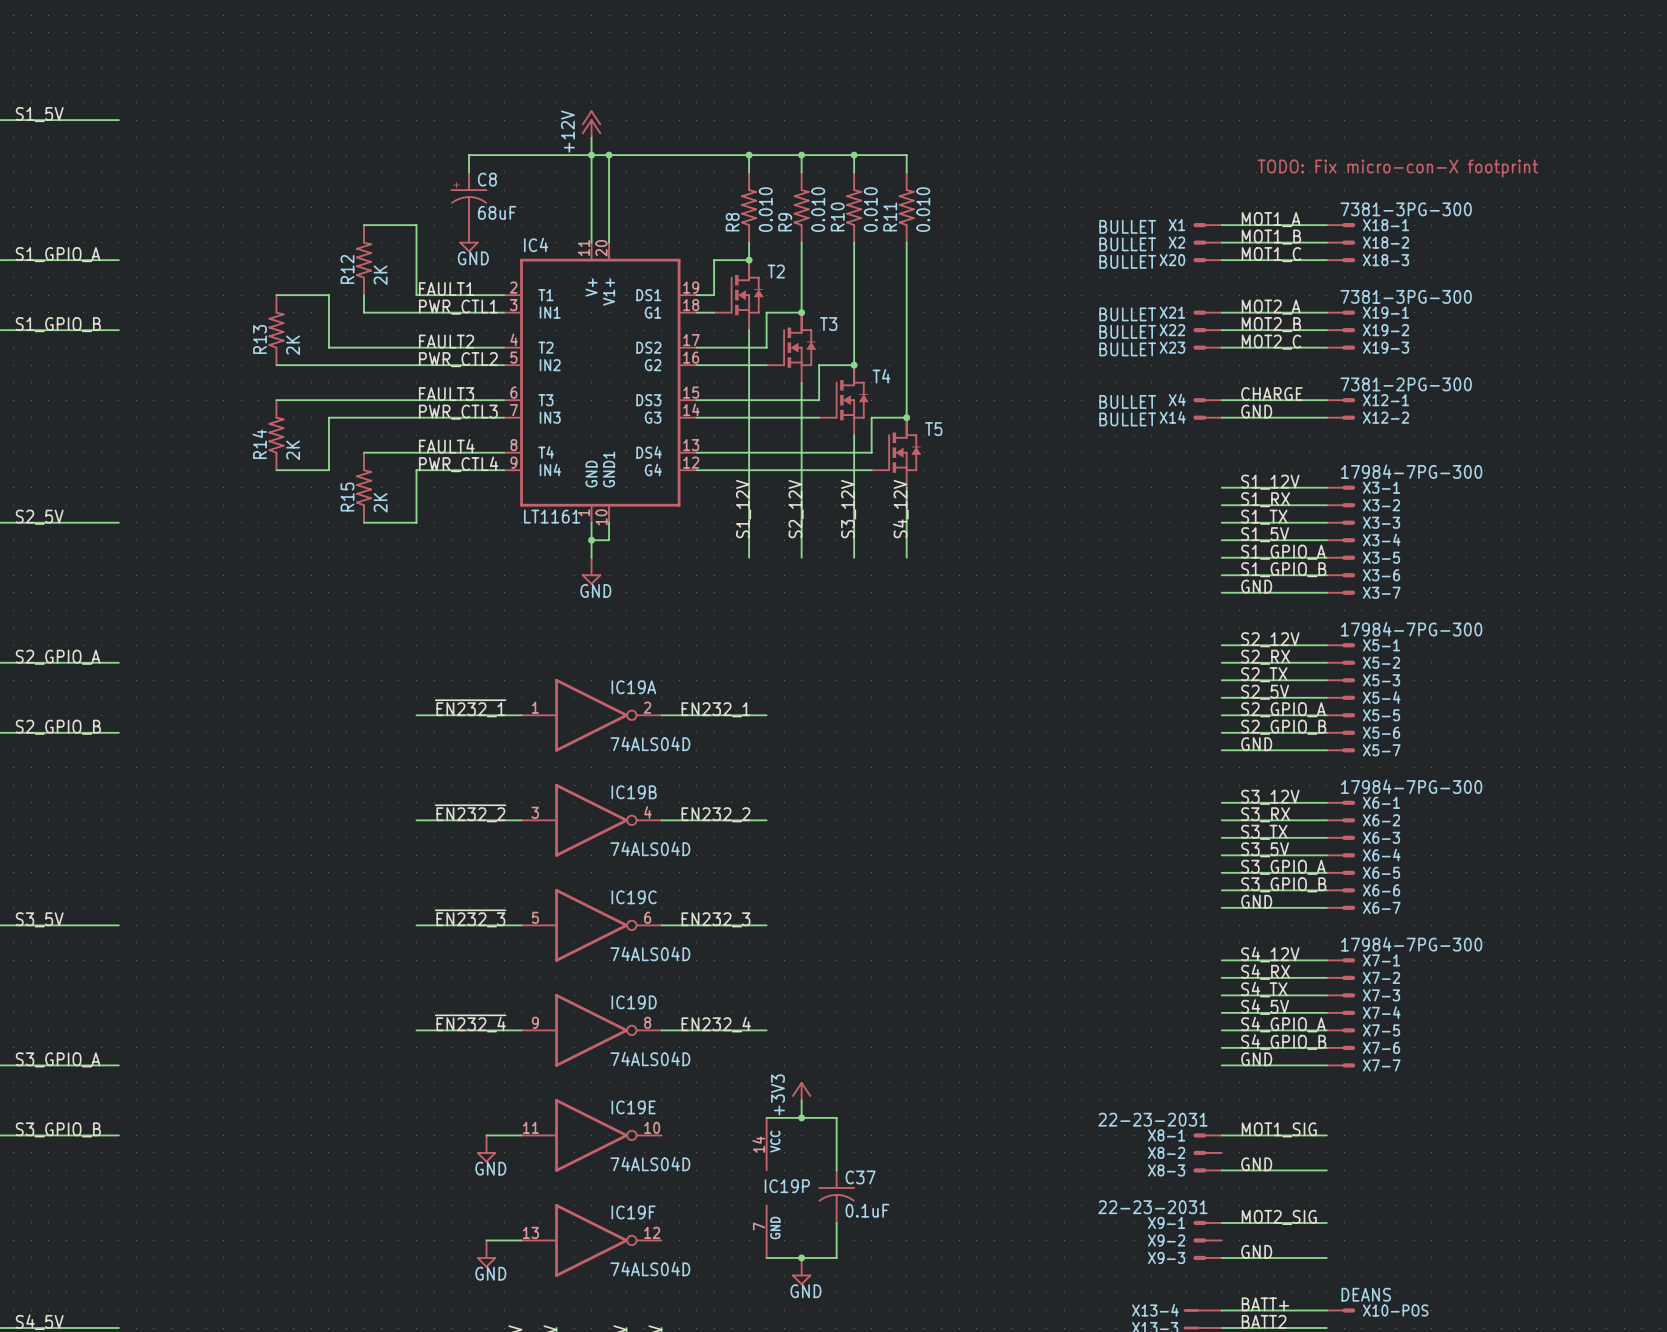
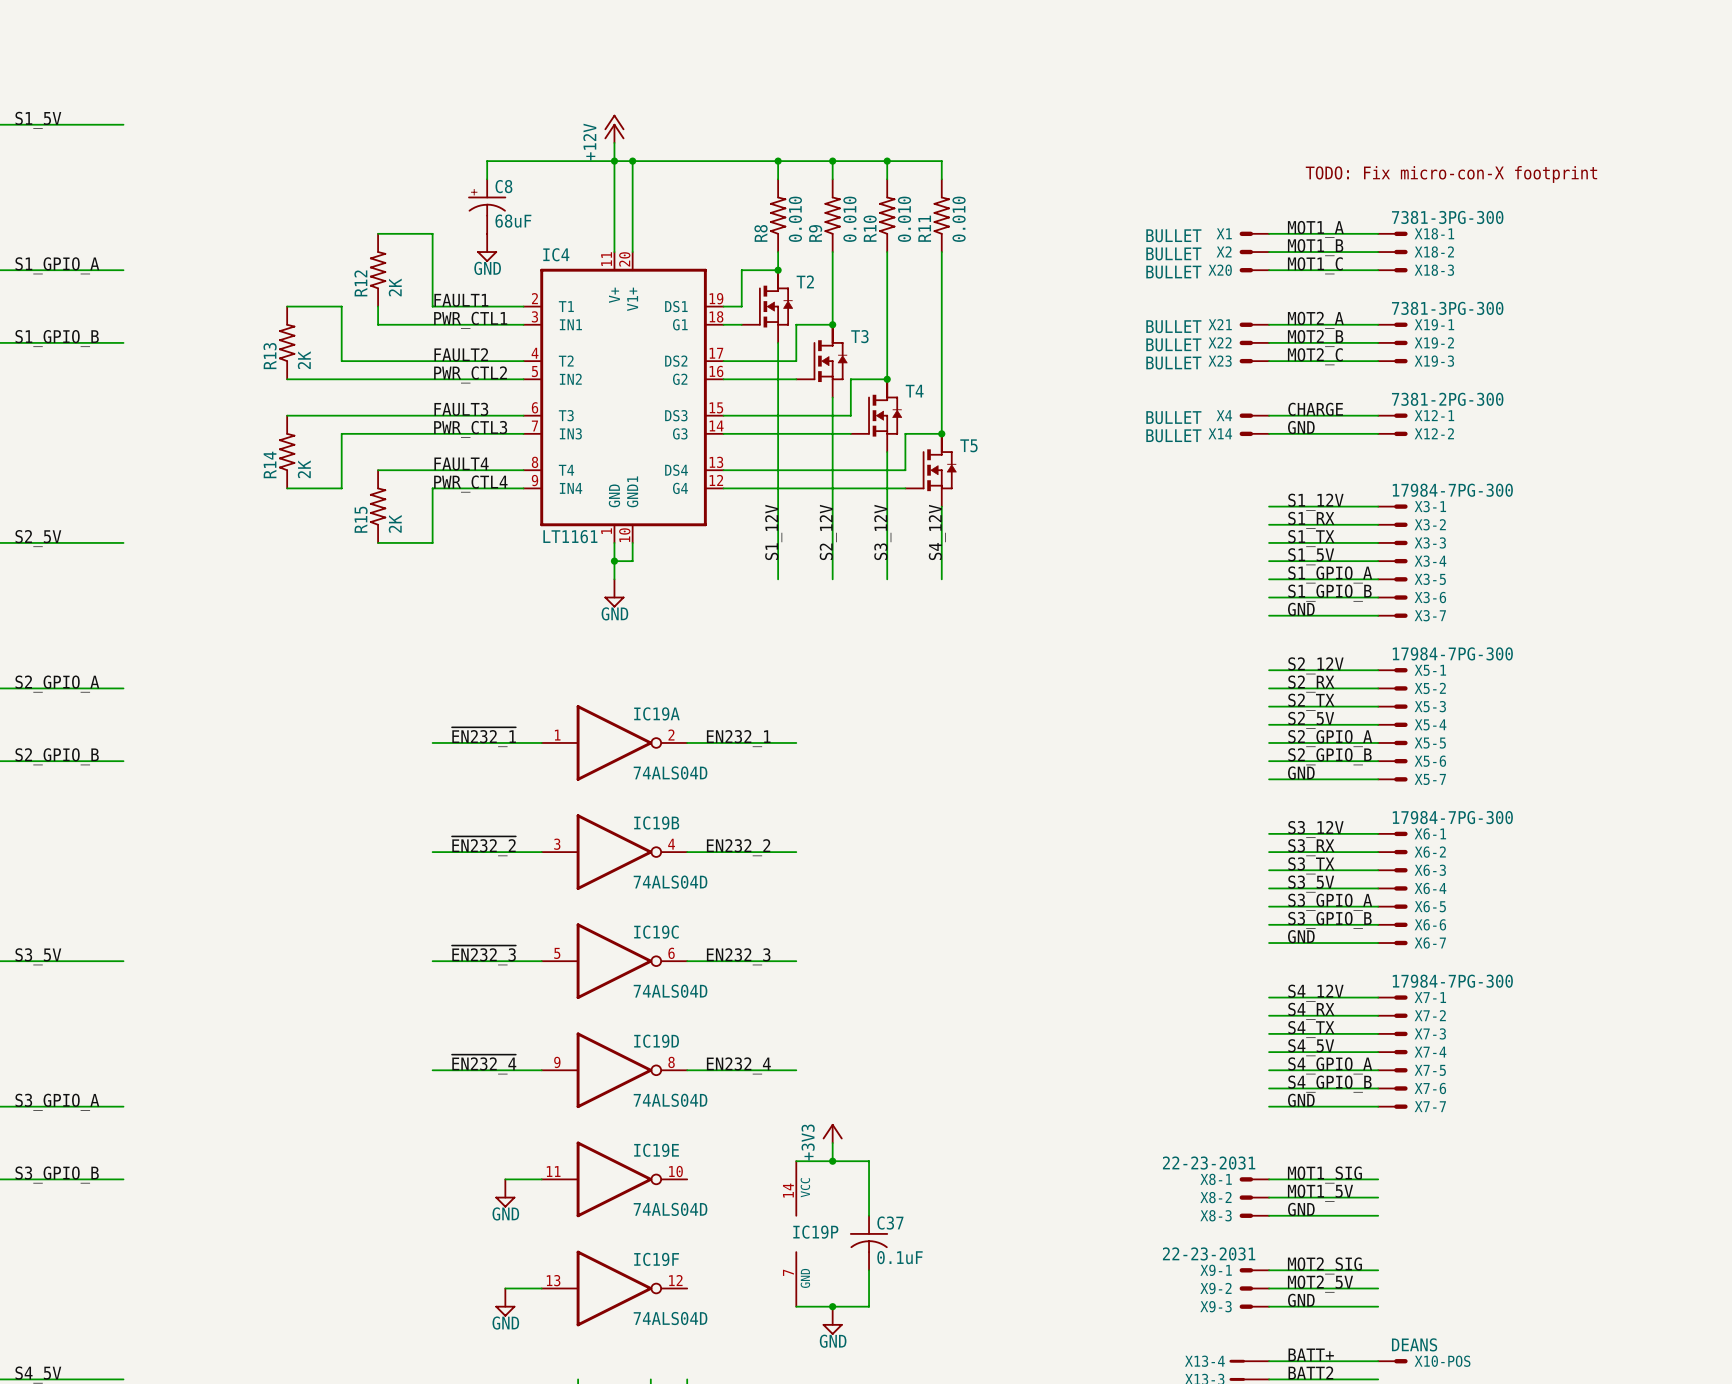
label: none -> MOT1_5V (1320, 1193)
wire: none -> (1269, 1197) (1378, 1197)
label: none -> MOT2_5V (1320, 1284)
wire: none -> (1269, 1288) (1378, 1288)

